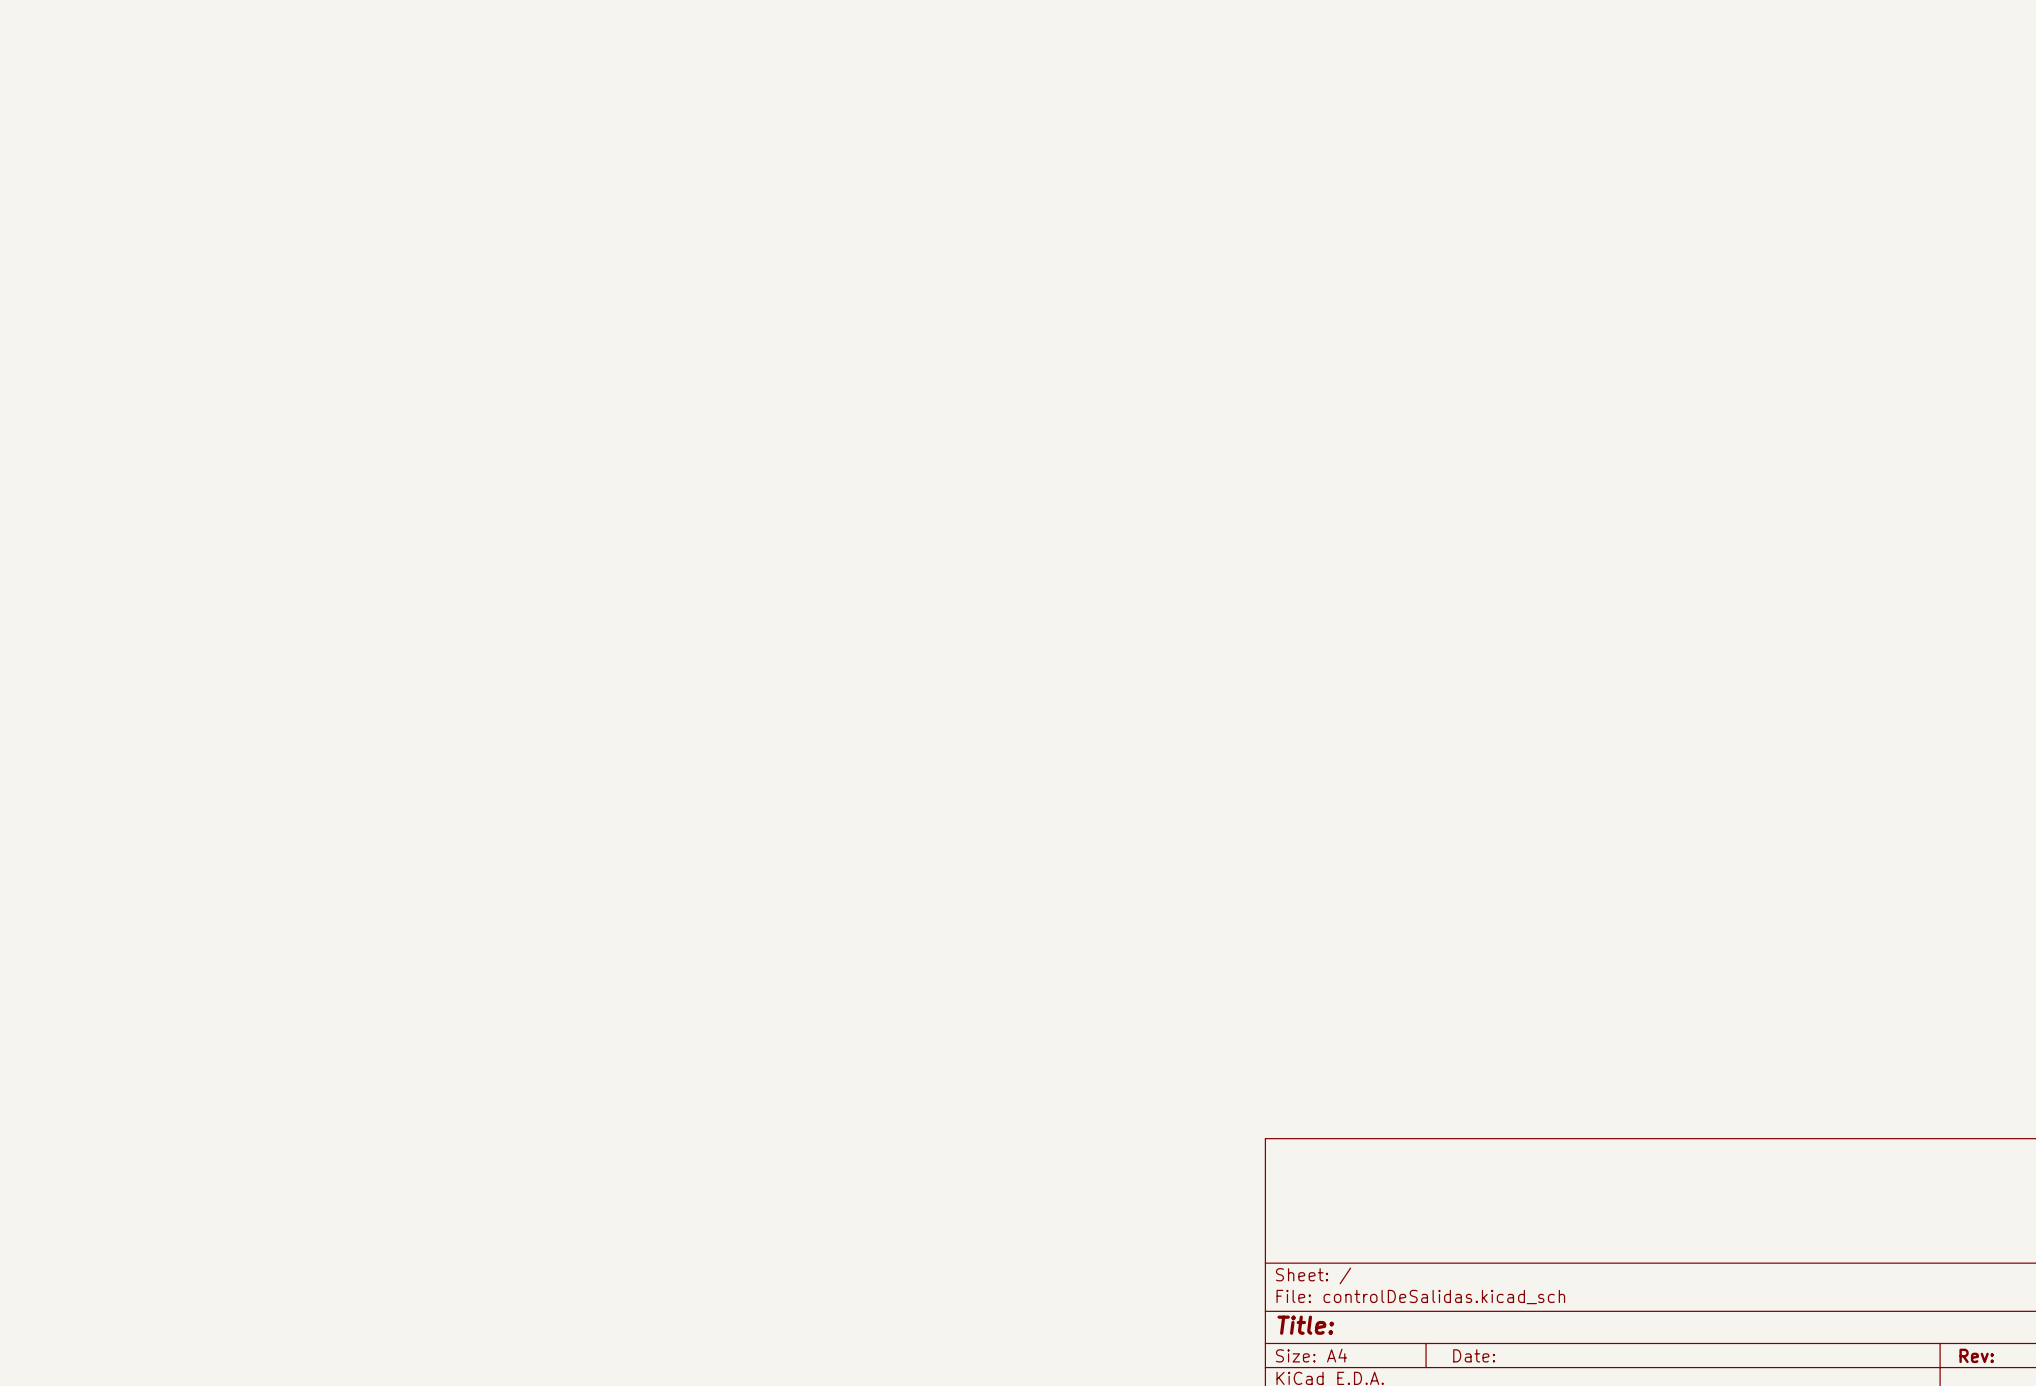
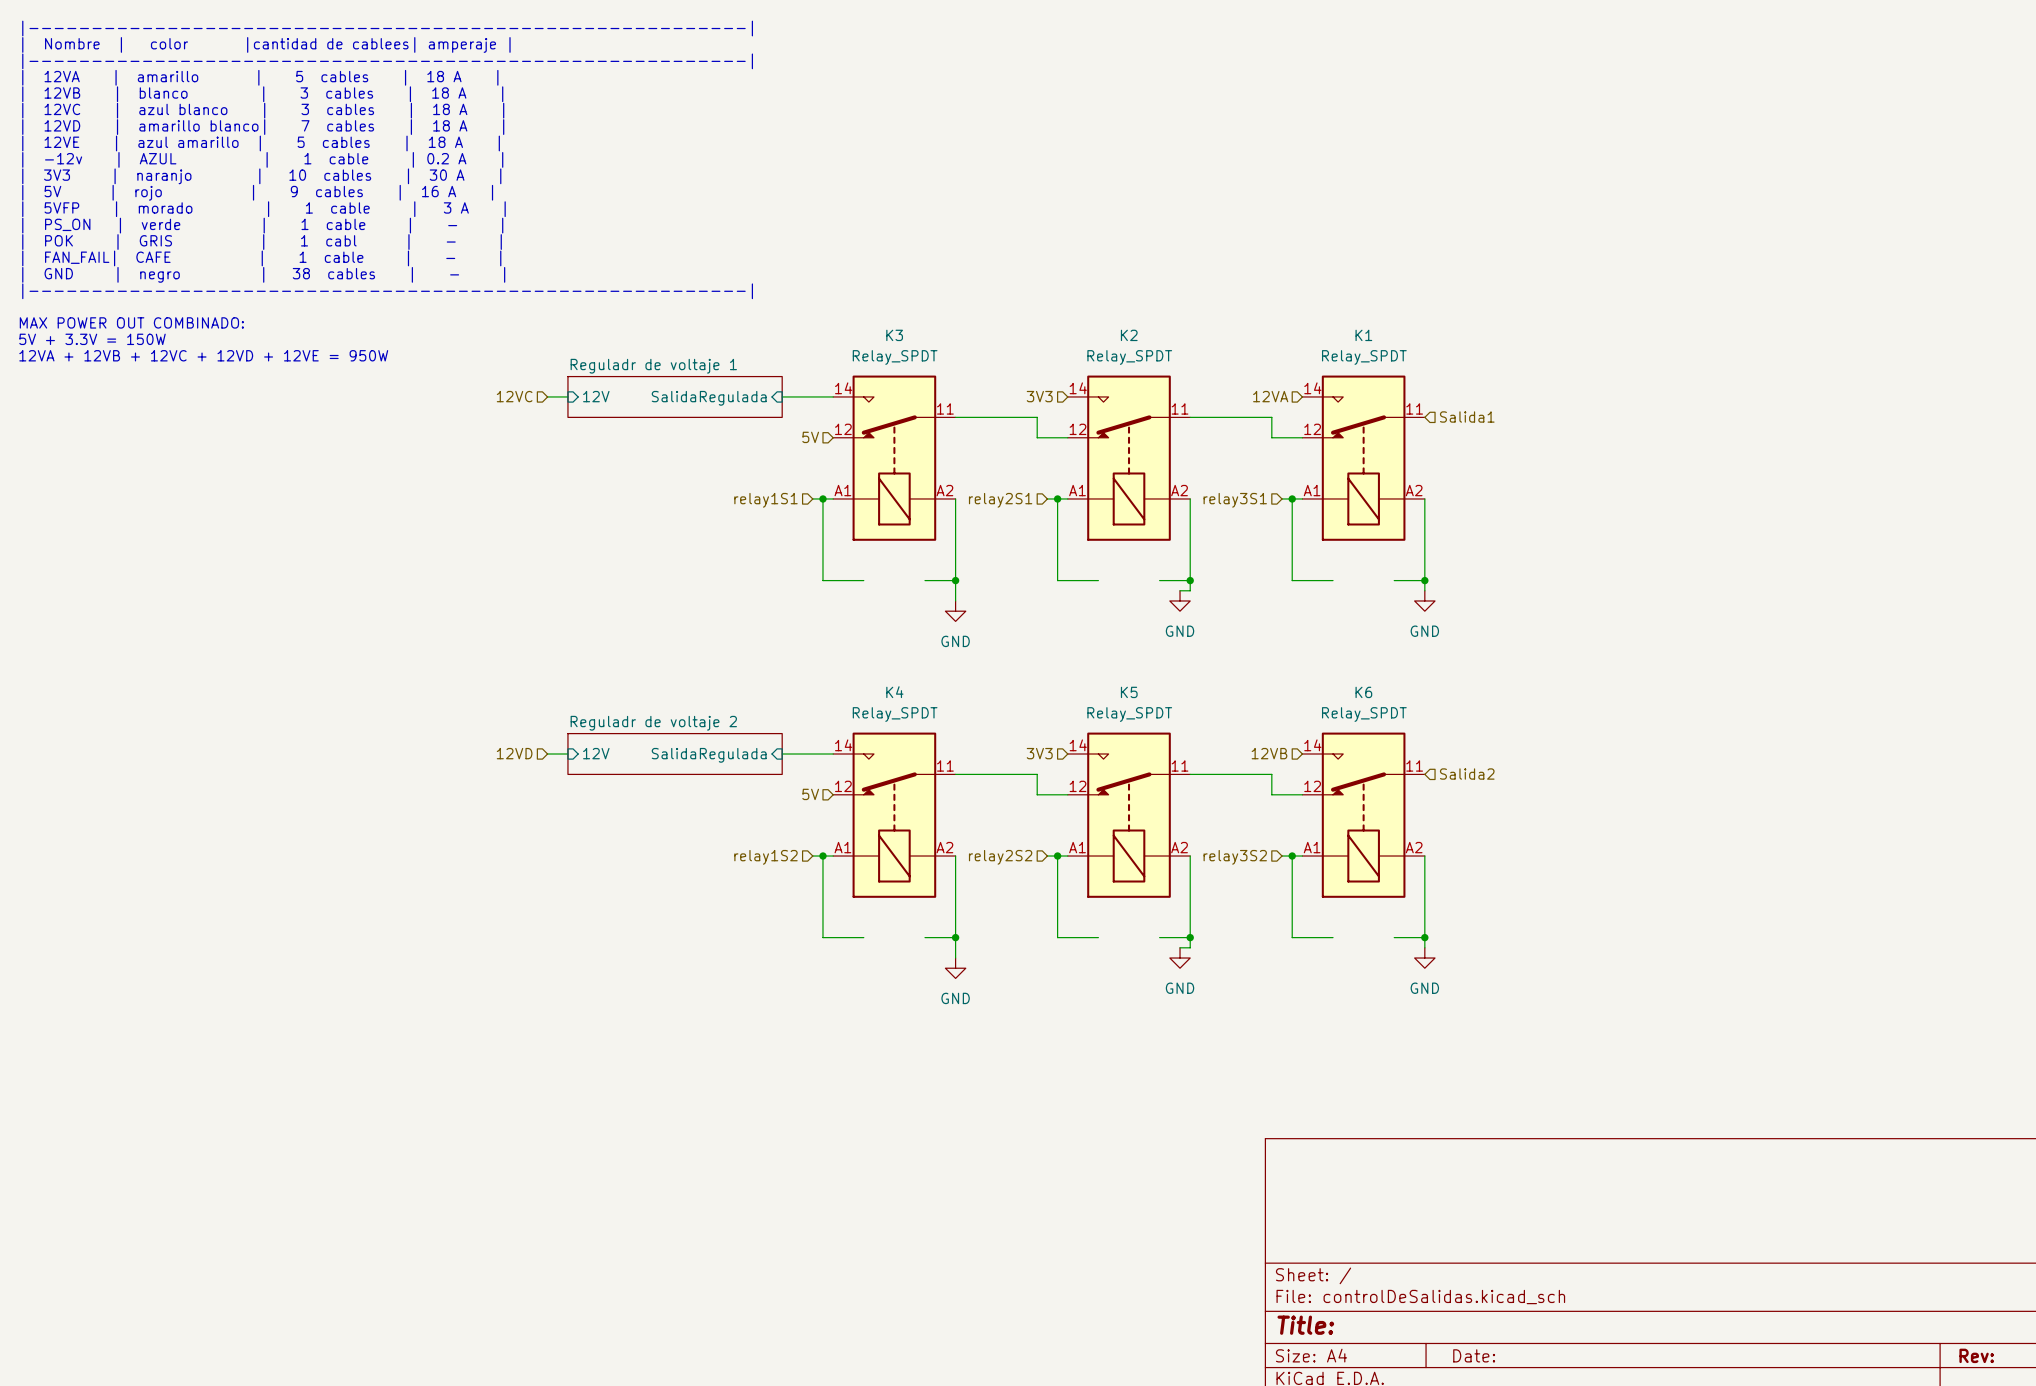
text: none -> |---------------------------------------------------------| (387, 28)
text: none -> | Nombre | color |cantidad de cablees| amperaje | (266, 44)
text: none -> |---------------------------------------------------------| (387, 61)
text: none -> | 12VA | amarillo | 5 cables | 18 A | (260, 77)
text: none -> | 12VB | blanco | 3 cables | 18 A | (262, 94)
text: none -> | 12VC | azul blanco | 3 cables | 18 A | (263, 110)
text: none -> | 12VD | amarillo blanco| 7 cables | 18 A | (263, 127)
text: none -> | 12VE | azul amarillo | 5 cables | 18 A | (261, 143)
text: none -> | -12v | AZUL | 1 cable | 0.2 A | (262, 159)
text: none -> | 3V3 | naranjo | 10 cables | 30 A | (261, 176)
text: none -> | 5V | rojo | 9 cables | 16 A | (257, 192)
text: none -> | 5VFP | morado | 1 cable | 3 A | (263, 209)
text: none -> | PS_ON | verde | 1 cable | - | (262, 225)
text: none -> | POK | GRIS | 1 cabl | - | (262, 242)
text: none -> | FAN_FAIL| CAFE | 1 cable | - | (261, 258)
text: none -> | GND | negro | 38 cables | - | (263, 274)
text: none -> |---------------------------------------------------------| (387, 291)
text: none -> MAX POWER OUT COMBINADO: (131, 322)
text: none -> 5V + 3.3V = 150W (92, 339)
text: none -> 12VA + 12VB + 12VC + 12VD + 12VE = 950W (203, 355)
hierarchical label: none -> 12VC (514, 396)
wire: none -> (547, 396) (567, 396)
sheet pin: none -> 12V (596, 396)
sheet Reguladr de voltaje 1: none -> (675, 396)
wire: none -> (782, 396) (833, 396)
hierarchical label: none -> 3V3 (1039, 396)
hierarchical label: none -> 12VA (1270, 396)
sheet pin: none -> SalidaRegulada (709, 398)
hierarchical label: none -> Salida1 (1467, 416)
wire: none -> (955, 417) (1037, 417) (1037, 437) (1067, 437)
wire: none -> (1190, 417) (1271, 417) (1271, 437) (1302, 437)
hierarchical label: none -> 5V (810, 437)
K3: none -> Relay_SPDT (894, 458)
K2: none -> Relay_SPDT (1129, 458)
K1: none -> Relay_SPDT (1363, 458)
wire: none -> (812, 498) (833, 498)
wire: none -> (822, 498) (822, 580) (863, 580)
junction: none -> (822, 498)
wire: none -> (955, 498) (955, 600)
wire: none -> (1047, 498) (1067, 498)
wire: none -> (1057, 498) (1057, 580) (1098, 580)
junction: none -> (1057, 498)
wire: none -> (1190, 498) (1190, 590) (1180, 590)
wire: none -> (1282, 498) (1302, 498)
wire: none -> (1292, 498) (1292, 580) (1333, 580)
junction: none -> (1292, 498)
wire: none -> (1424, 498) (1424, 590)
hierarchical label: none -> relay1S1 (766, 500)
hierarchical label: none -> relay2S1 (1000, 500)
hierarchical label: none -> relay3S1 (1235, 500)
wire: none -> (924, 580) (955, 580)
junction: none -> (955, 580)
wire: none -> (1159, 580) (1190, 580)
junction: none -> (1190, 580)
wire: none -> (1394, 580) (1424, 580)
junction: none -> (1424, 580)
power symbol: none -> GND (1180, 600)
power symbol: none -> GND (1424, 600)
power symbol: none -> GND (955, 611)
hierarchical label: none -> 12VD (514, 753)
sheet pin: none -> 12V (596, 753)
hierarchical label: none -> 3V3 (1039, 753)
hierarchical label: none -> 12VB (1269, 753)
wire: none -> (547, 754) (567, 754)
sheet Reguladr de voltaje 2: none -> (675, 754)
wire: none -> (782, 754) (833, 754)
sheet pin: none -> SalidaRegulada (709, 755)
wire: none -> (955, 774) (1037, 774) (1037, 794) (1067, 794)
wire: none -> (1190, 774) (1271, 774) (1271, 794) (1302, 794)
hierarchical label: none -> Salida2 (1467, 774)
hierarchical label: none -> 5V (810, 794)
K4: none -> Relay_SPDT (894, 815)
K5: none -> Relay_SPDT (1129, 815)
K6: none -> Relay_SPDT (1363, 815)
wire: none -> (812, 856) (833, 856)
wire: none -> (822, 856) (822, 937) (863, 937)
junction: none -> (822, 856)
wire: none -> (955, 856) (955, 958)
wire: none -> (1047, 856) (1067, 856)
wire: none -> (1057, 856) (1057, 937) (1098, 937)
junction: none -> (1057, 856)
wire: none -> (1190, 856) (1190, 947) (1180, 947)
wire: none -> (1282, 856) (1302, 856)
wire: none -> (1292, 856) (1292, 937) (1333, 937)
junction: none -> (1292, 856)
wire: none -> (1424, 856) (1424, 947)
hierarchical label: none -> relay1S2 (766, 857)
hierarchical label: none -> relay2S2 (1000, 857)
hierarchical label: none -> relay3S2 (1235, 857)
wire: none -> (924, 937) (955, 937)
junction: none -> (955, 937)
wire: none -> (1159, 937) (1190, 937)
junction: none -> (1190, 937)
wire: none -> (1394, 937) (1424, 937)
junction: none -> (1424, 937)
power symbol: none -> GND (1180, 958)
power symbol: none -> GND (1424, 958)
power symbol: none -> GND (955, 968)

